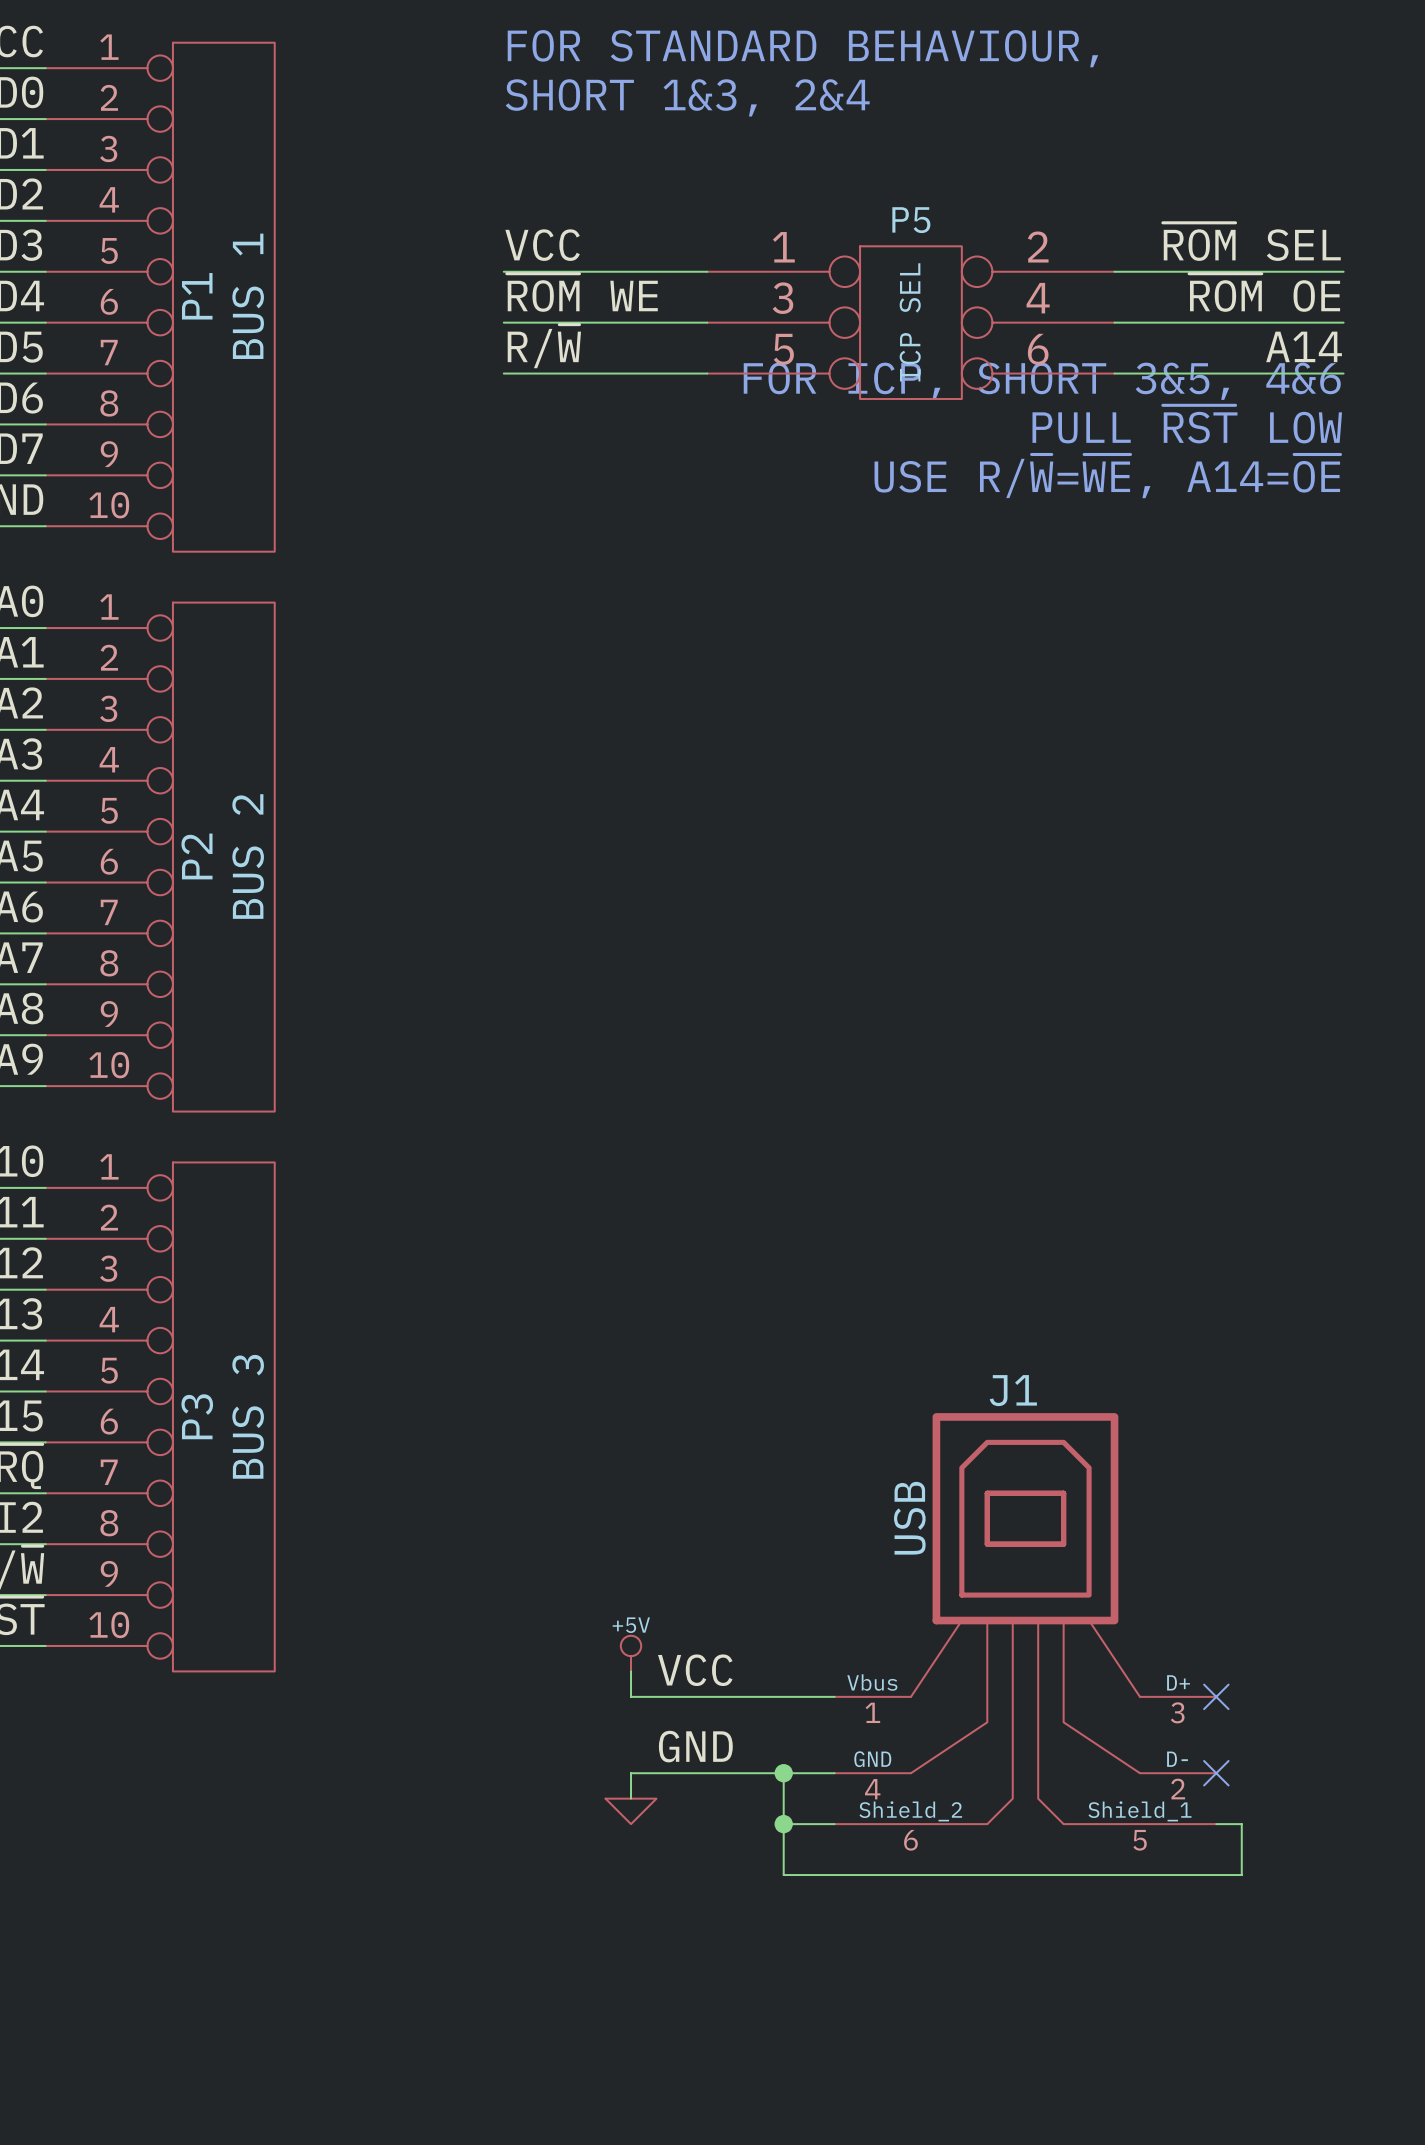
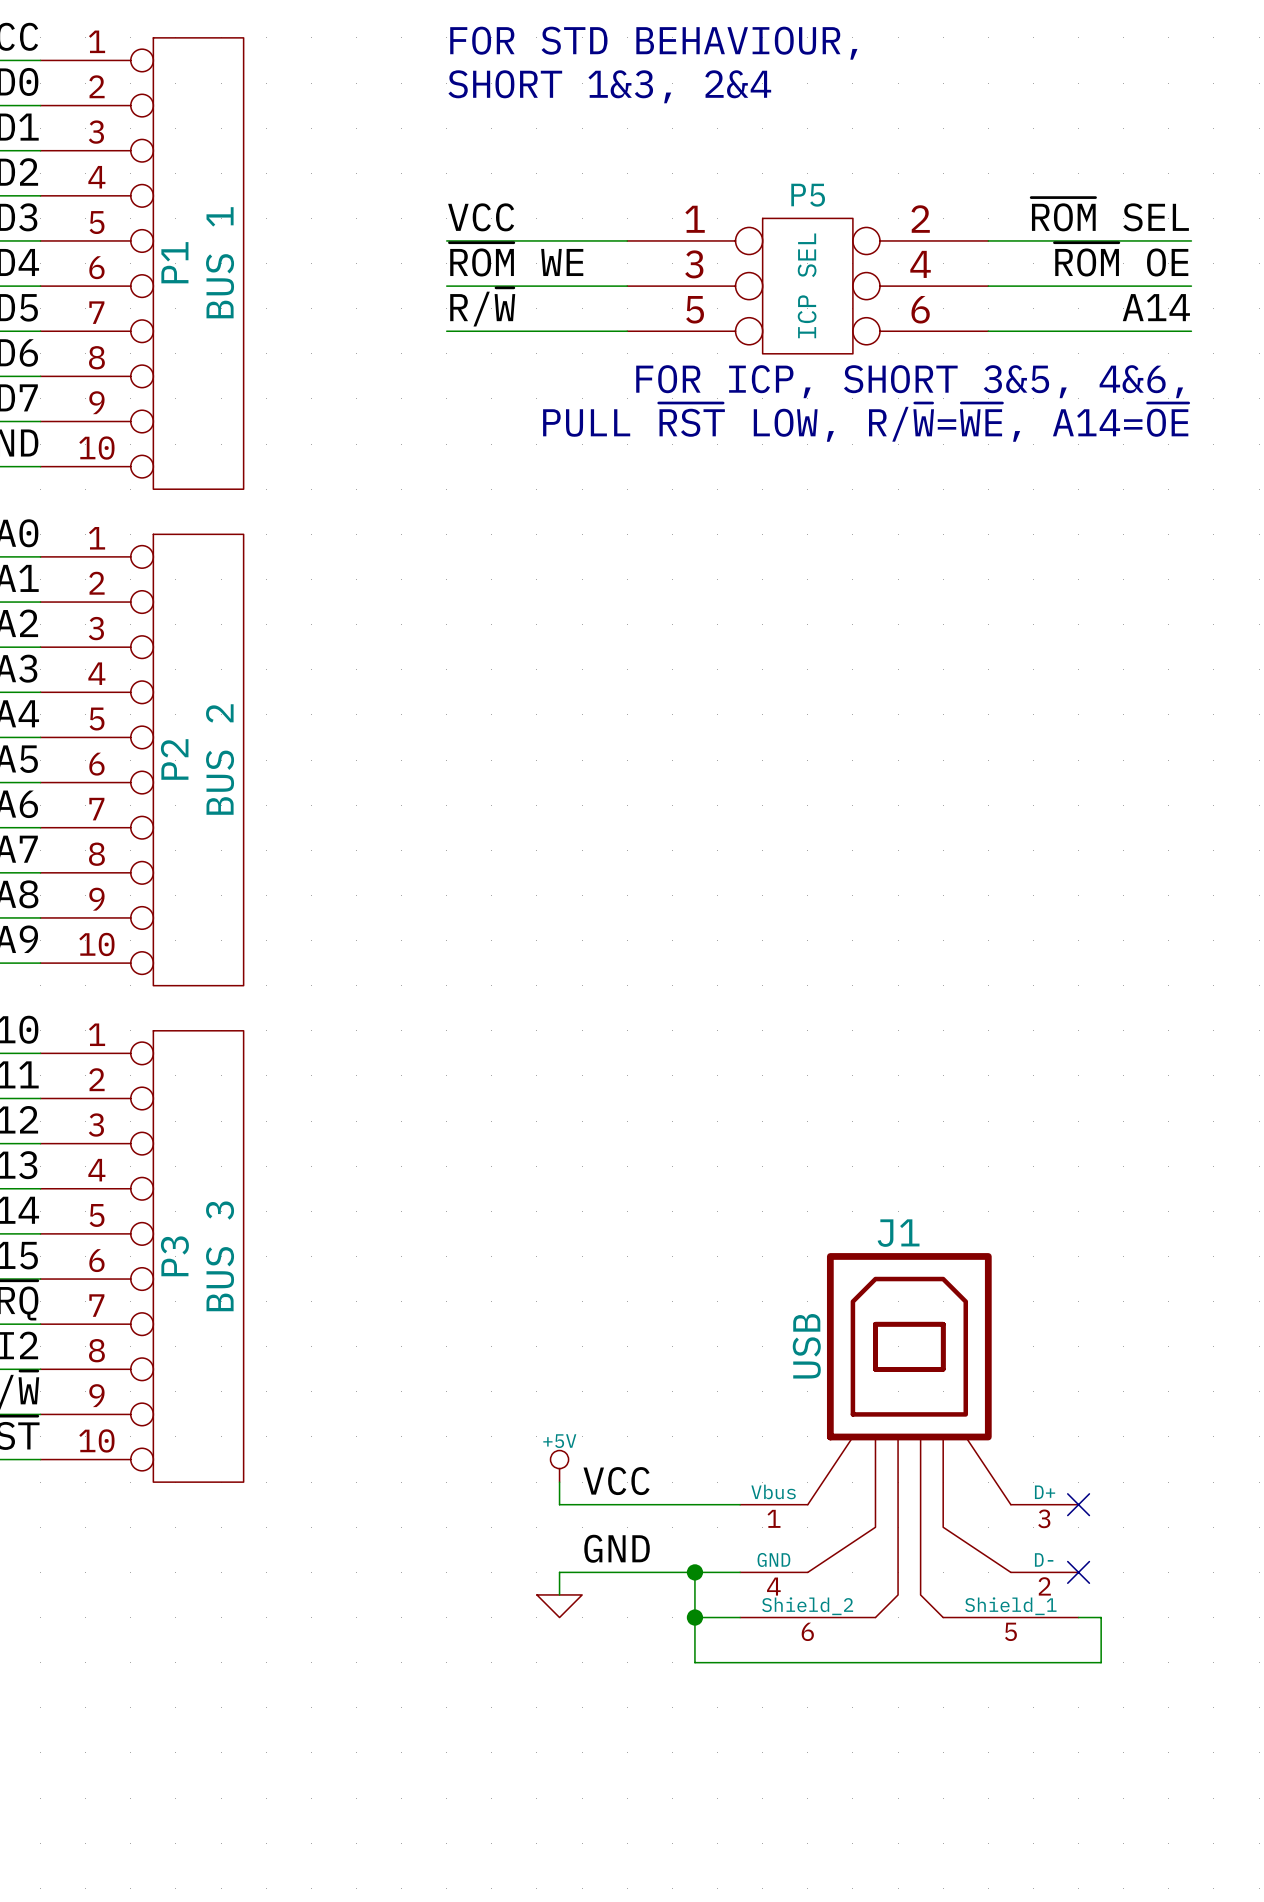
text: FOR STANDARD BEHAVIOUR, (802, 48) -> FOR STD BEHAVIOUR, (653, 43)
text: FOR ICP, SHORT 3&5, 4&6 (1042, 381) -> none
text: PULL ~{RST} LOW (1187, 424) -> FOR ICP, SHORT 3&5, 4&6, (909, 381)
text: USE R/~{W}=~{WE}, A14=~{OE} (1107, 476) -> PULL ~{RST} LOW, R/~{W}=~{WE}, A14=~{OE} (865, 422)

